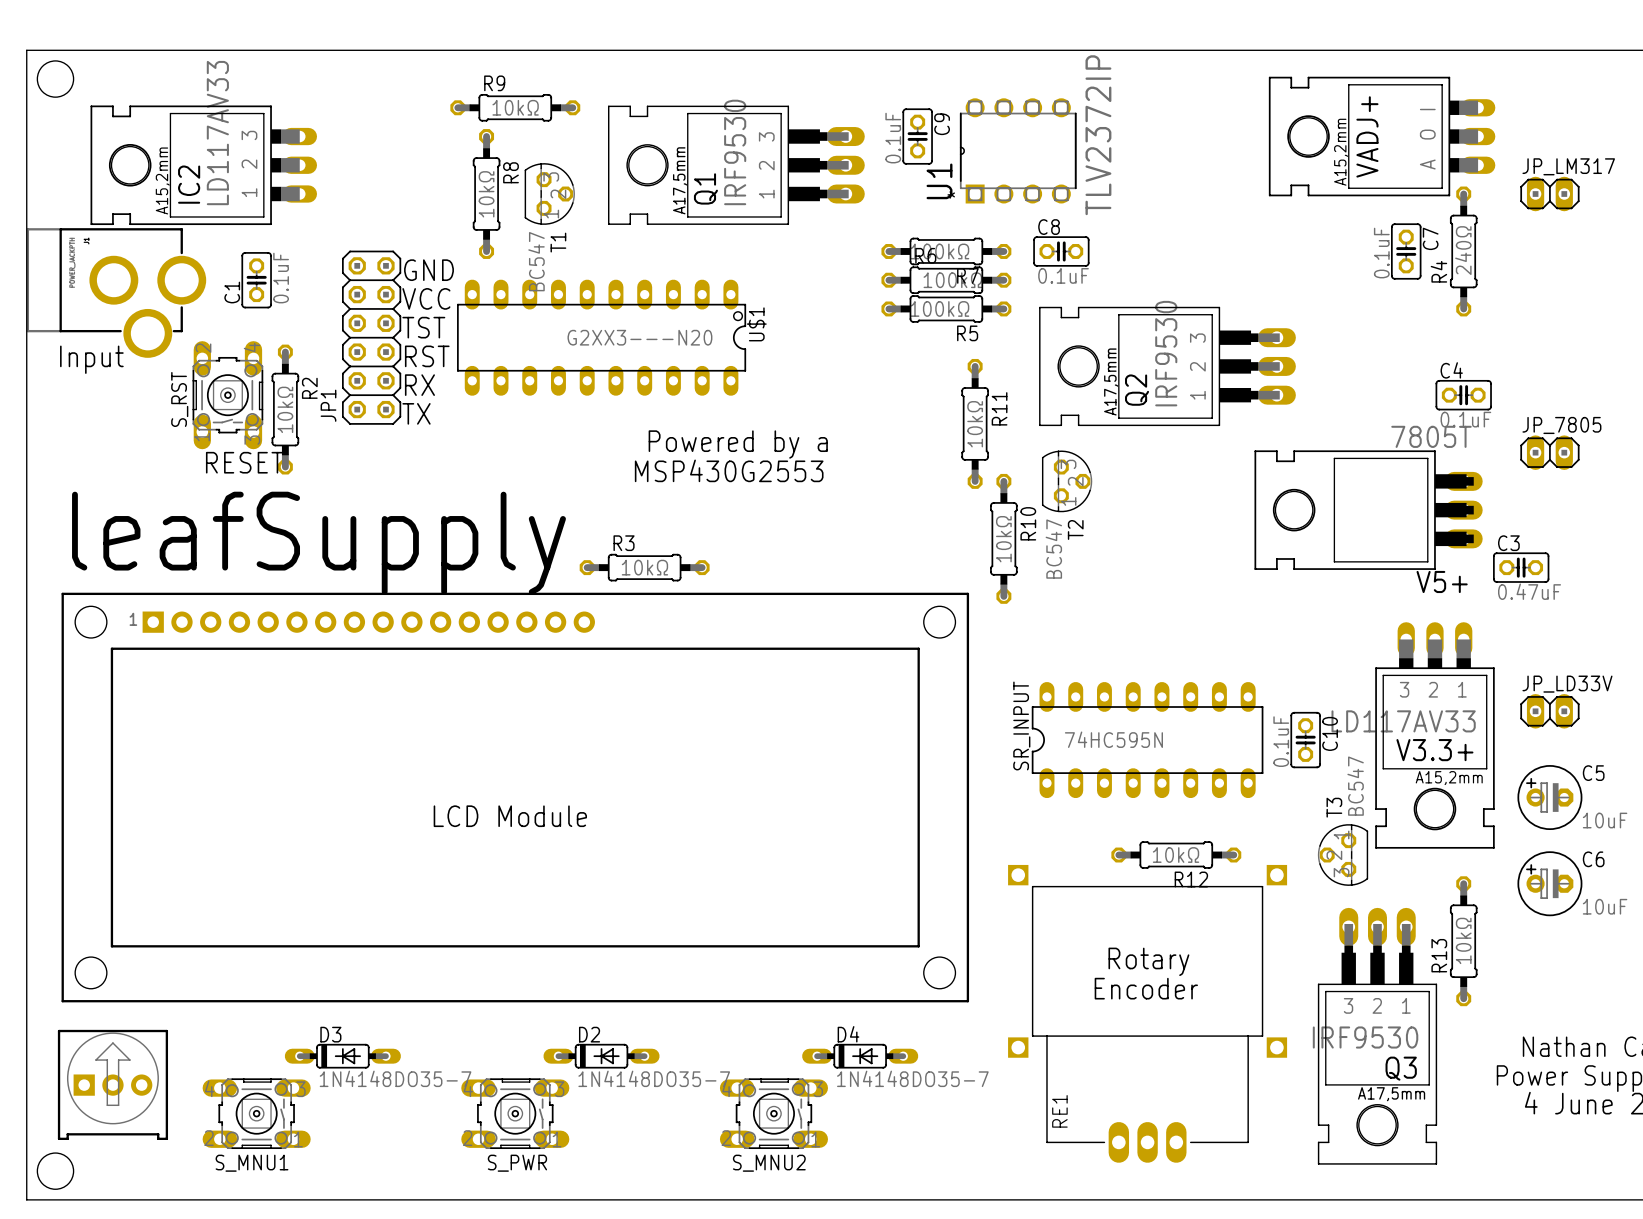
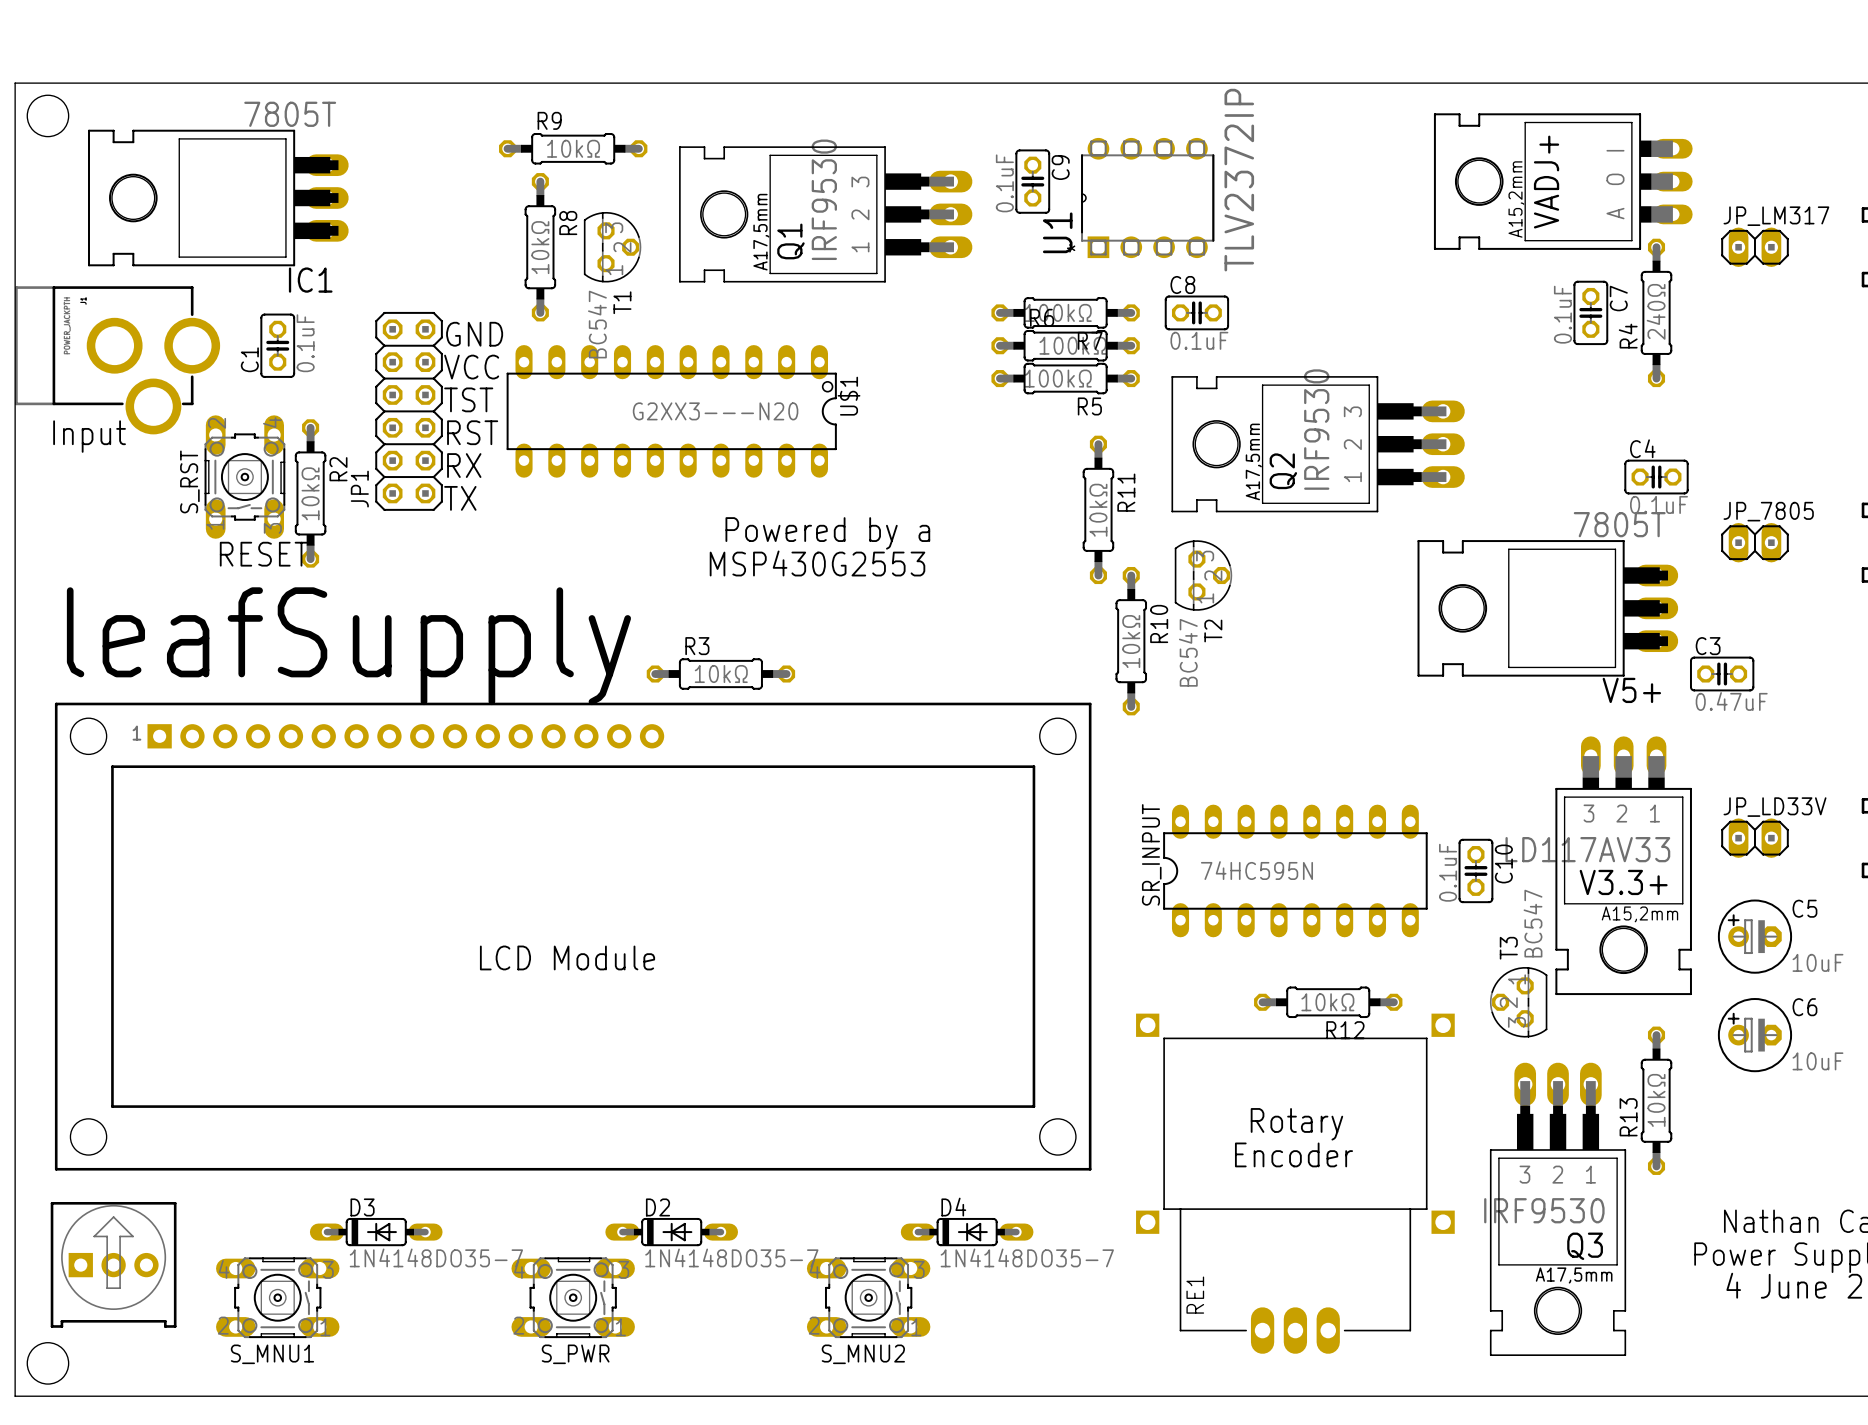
IC1: none -> 7805T (218, 198)
IC2: LD117AV33 (203, 165) -> none

